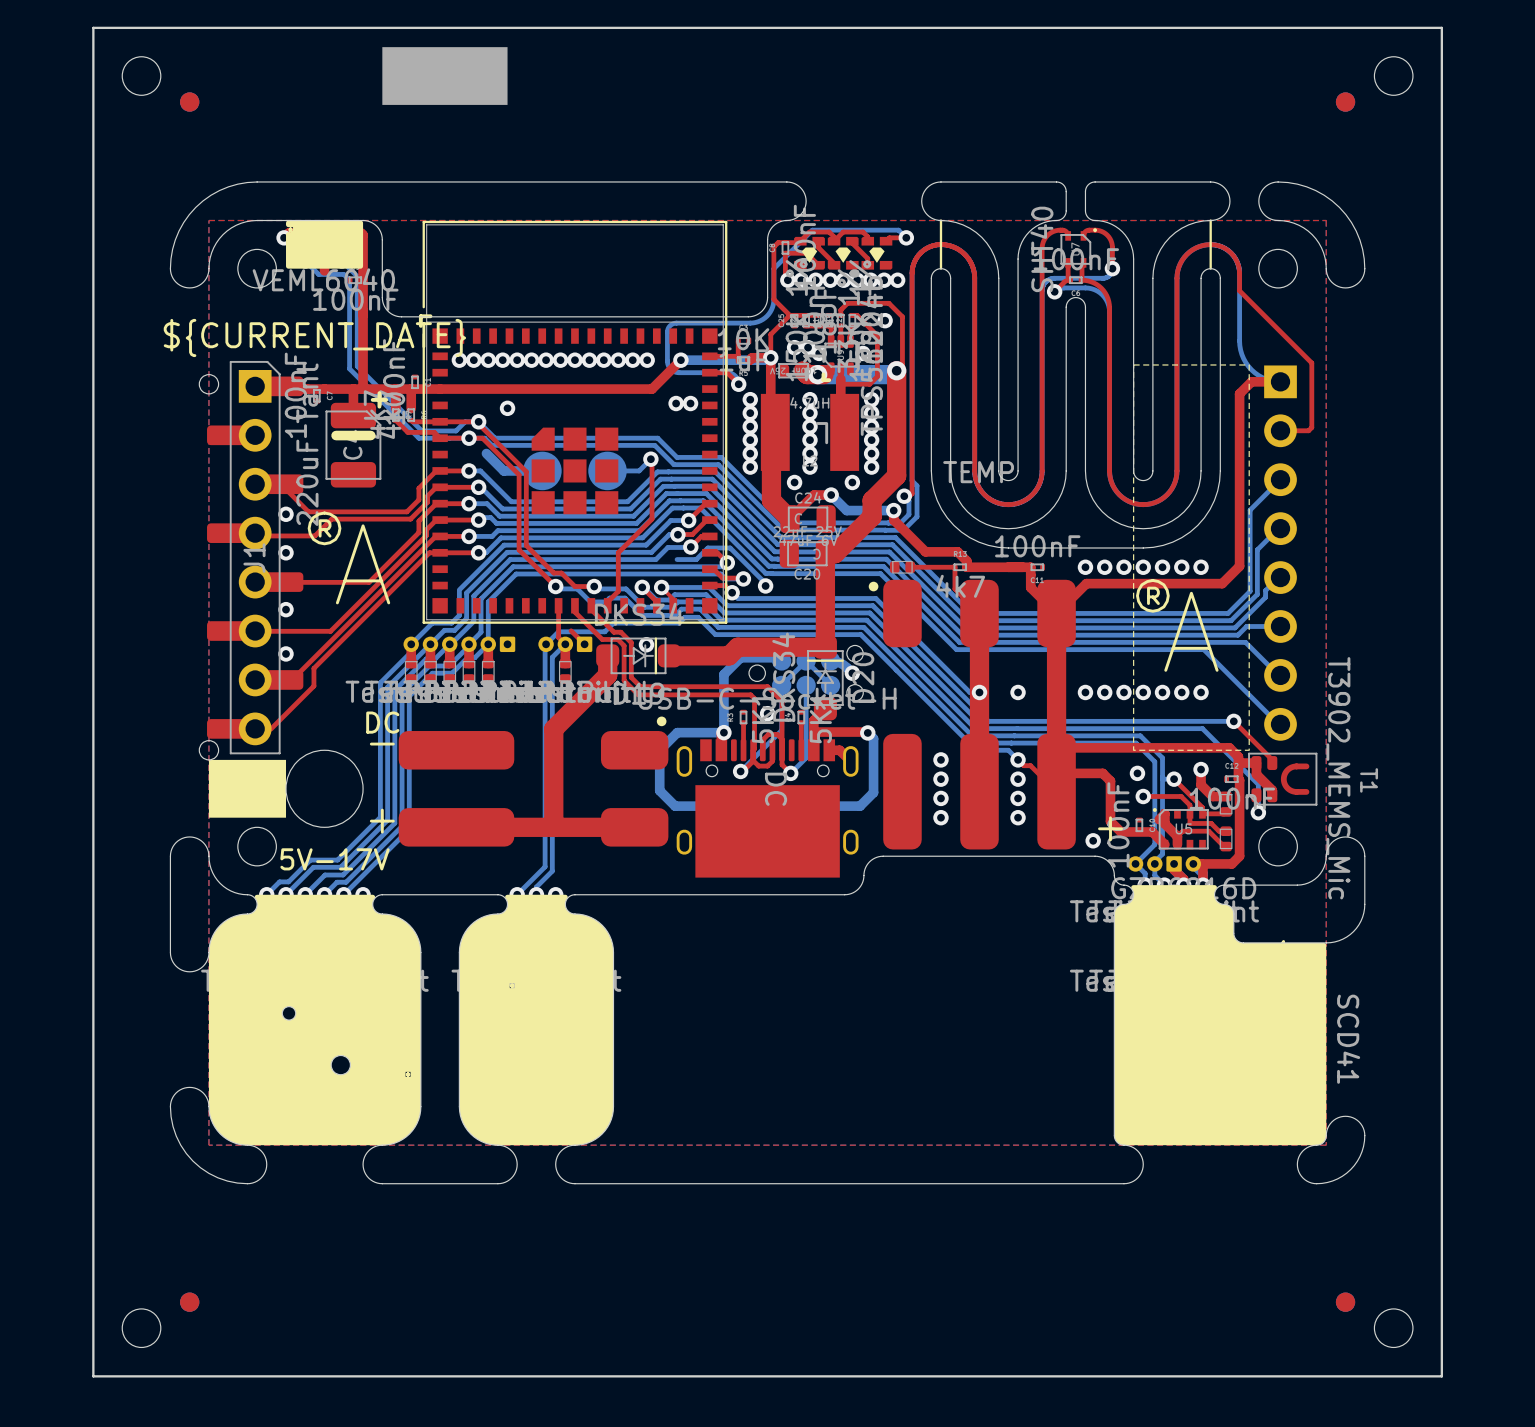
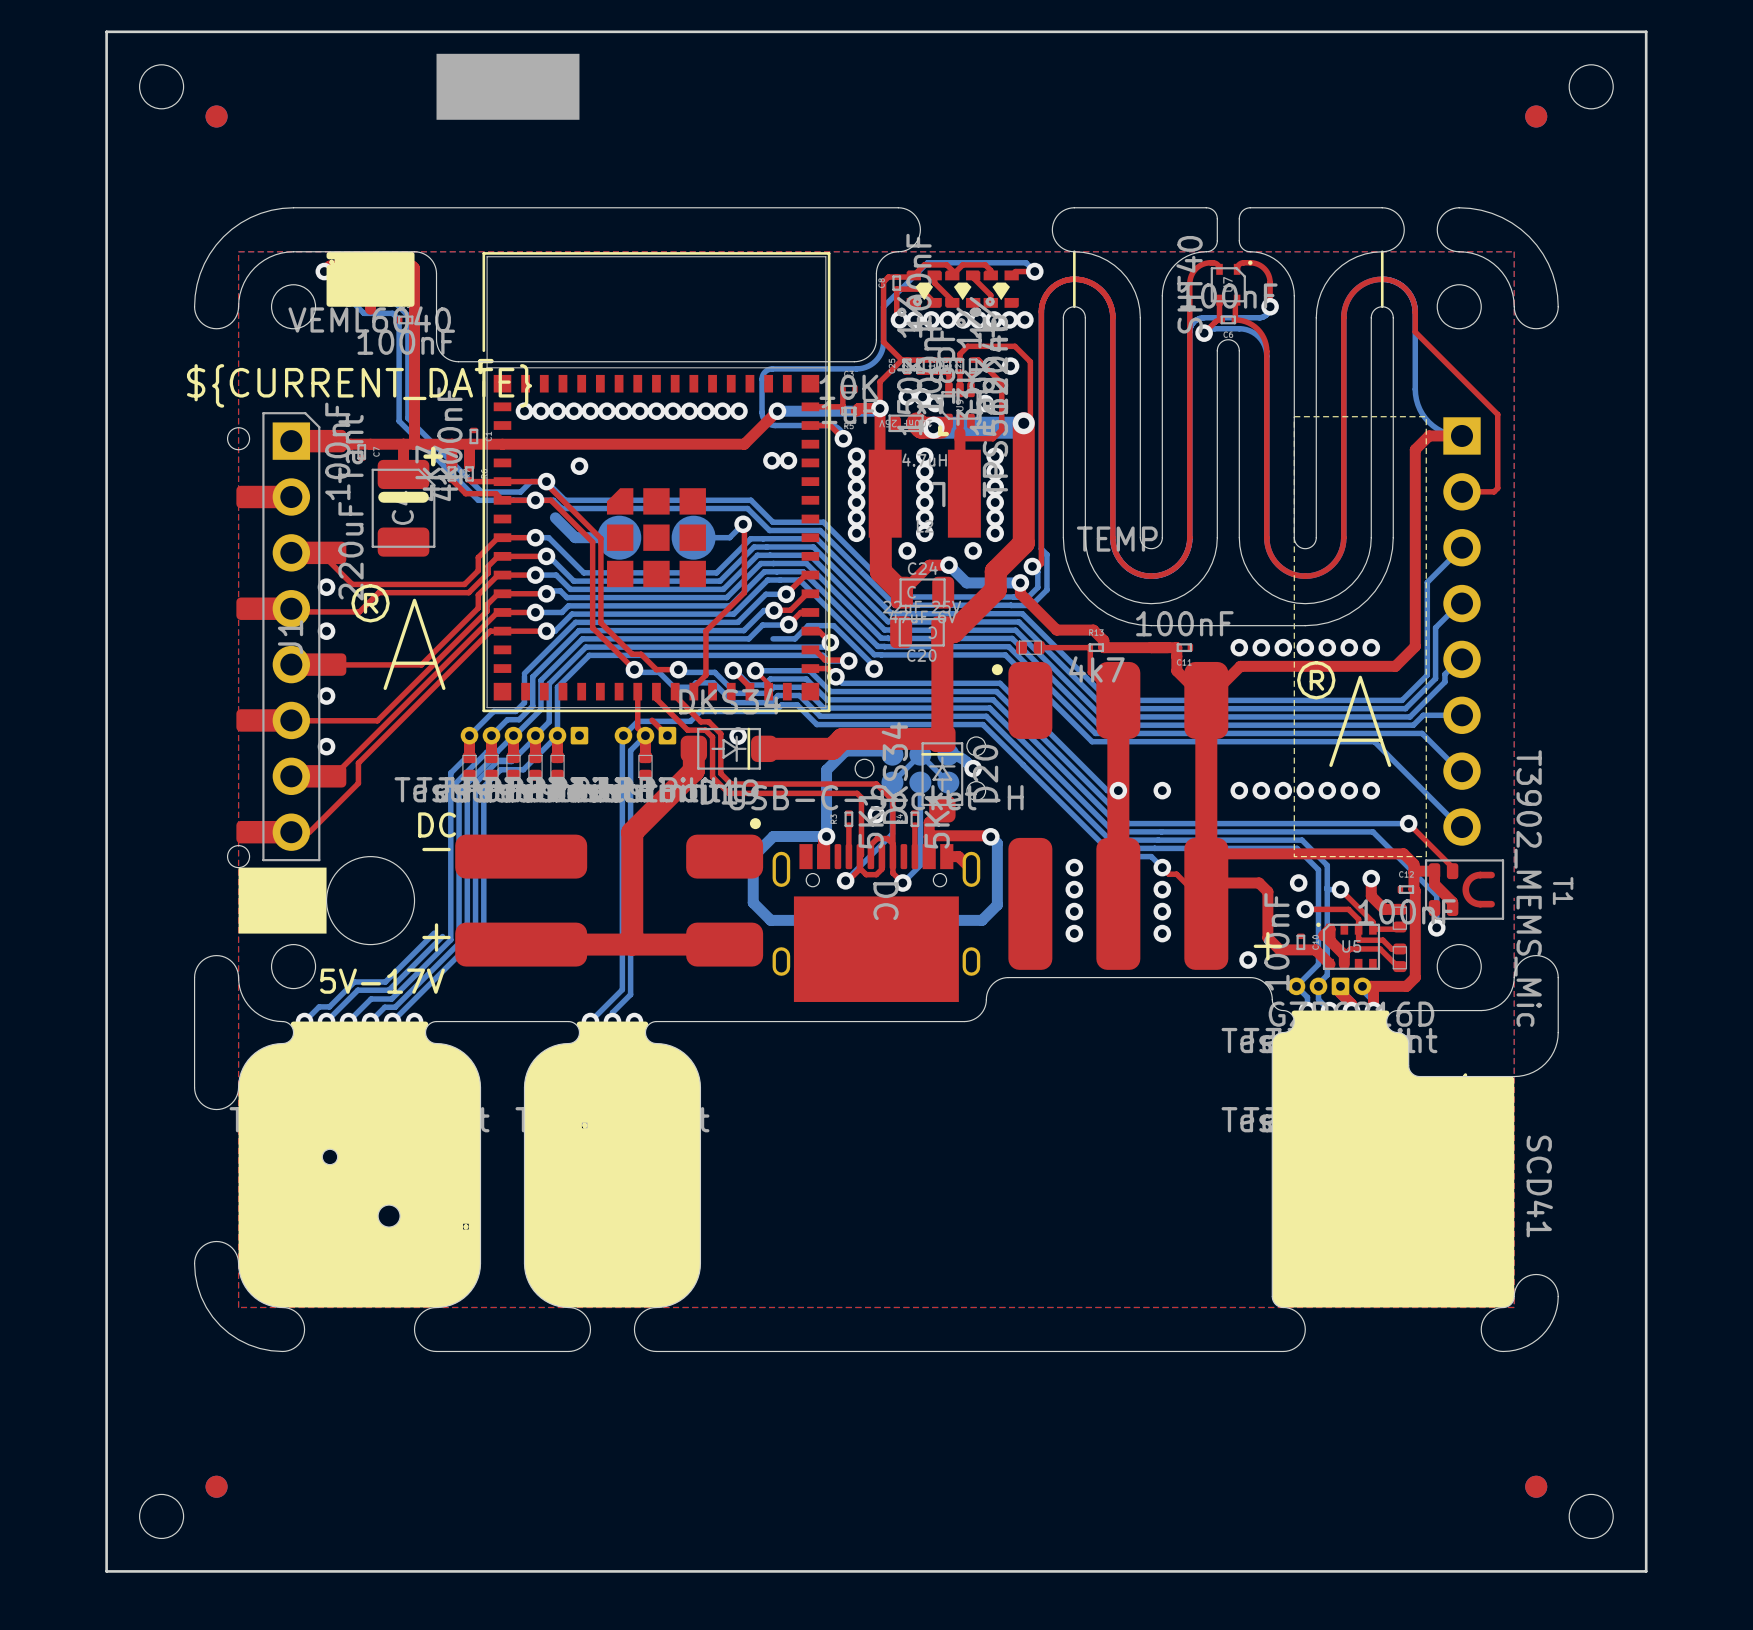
bottom track: (430, 644) (387, 687) (387, 820) -> none
bottom track: (411, 652) (380, 682) (380, 817) -> (469, 744) (469, 754) (450, 773) (450, 788)
bottom track: (474, 657) (467, 657) (452, 673) (432, 673) (409, 696) -> (542, 751) (523, 769) (500, 769) (483, 786) (483, 930) (467, 946)
bottom track: none -> (512, 760) (497, 761) (475, 783) (475, 926) (459, 943)

